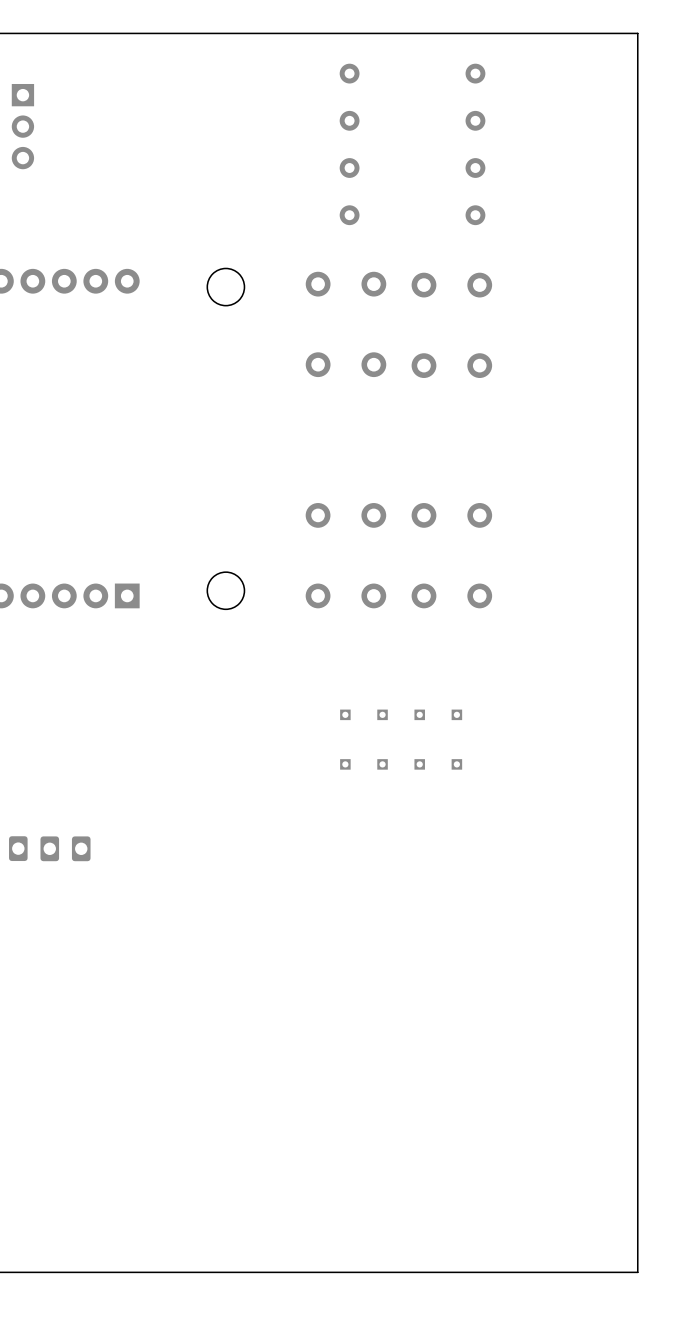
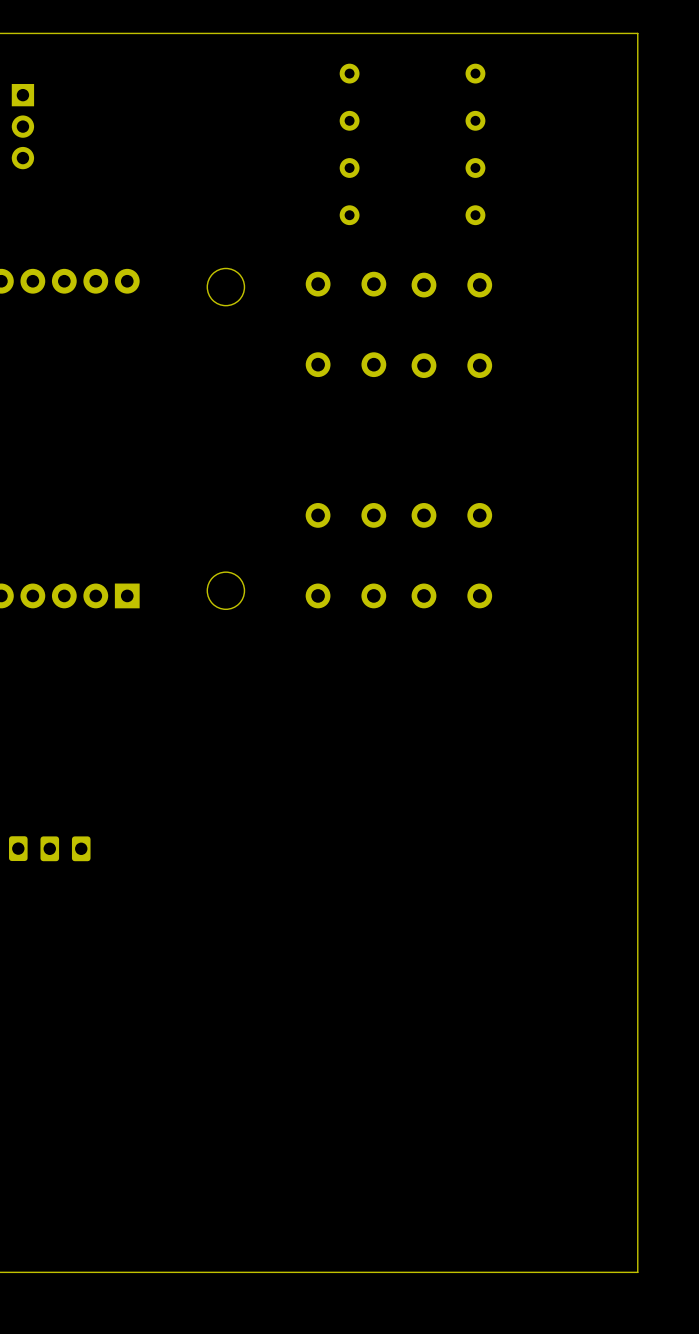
part: (345, 714) -> none
part: (382, 714) -> none
part: (419, 714) -> none
part: (456, 714) -> none
part: (345, 764) -> none
part: (382, 764) -> none
part: (419, 764) -> none
part: (456, 764) -> none

